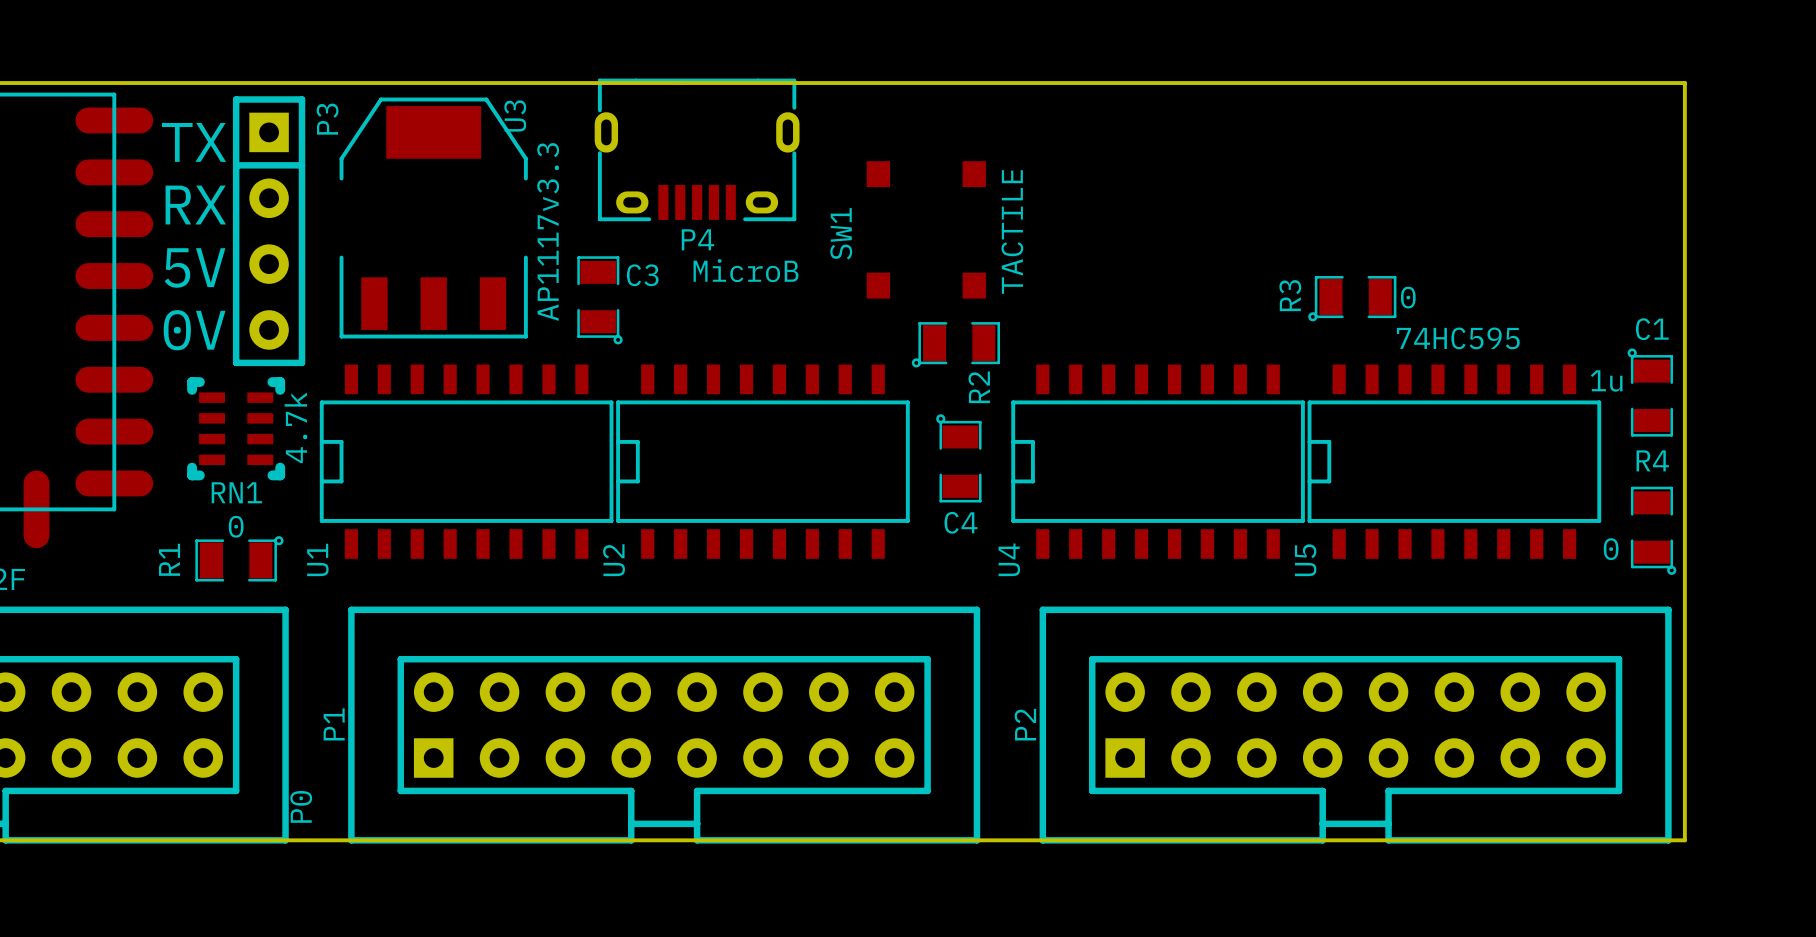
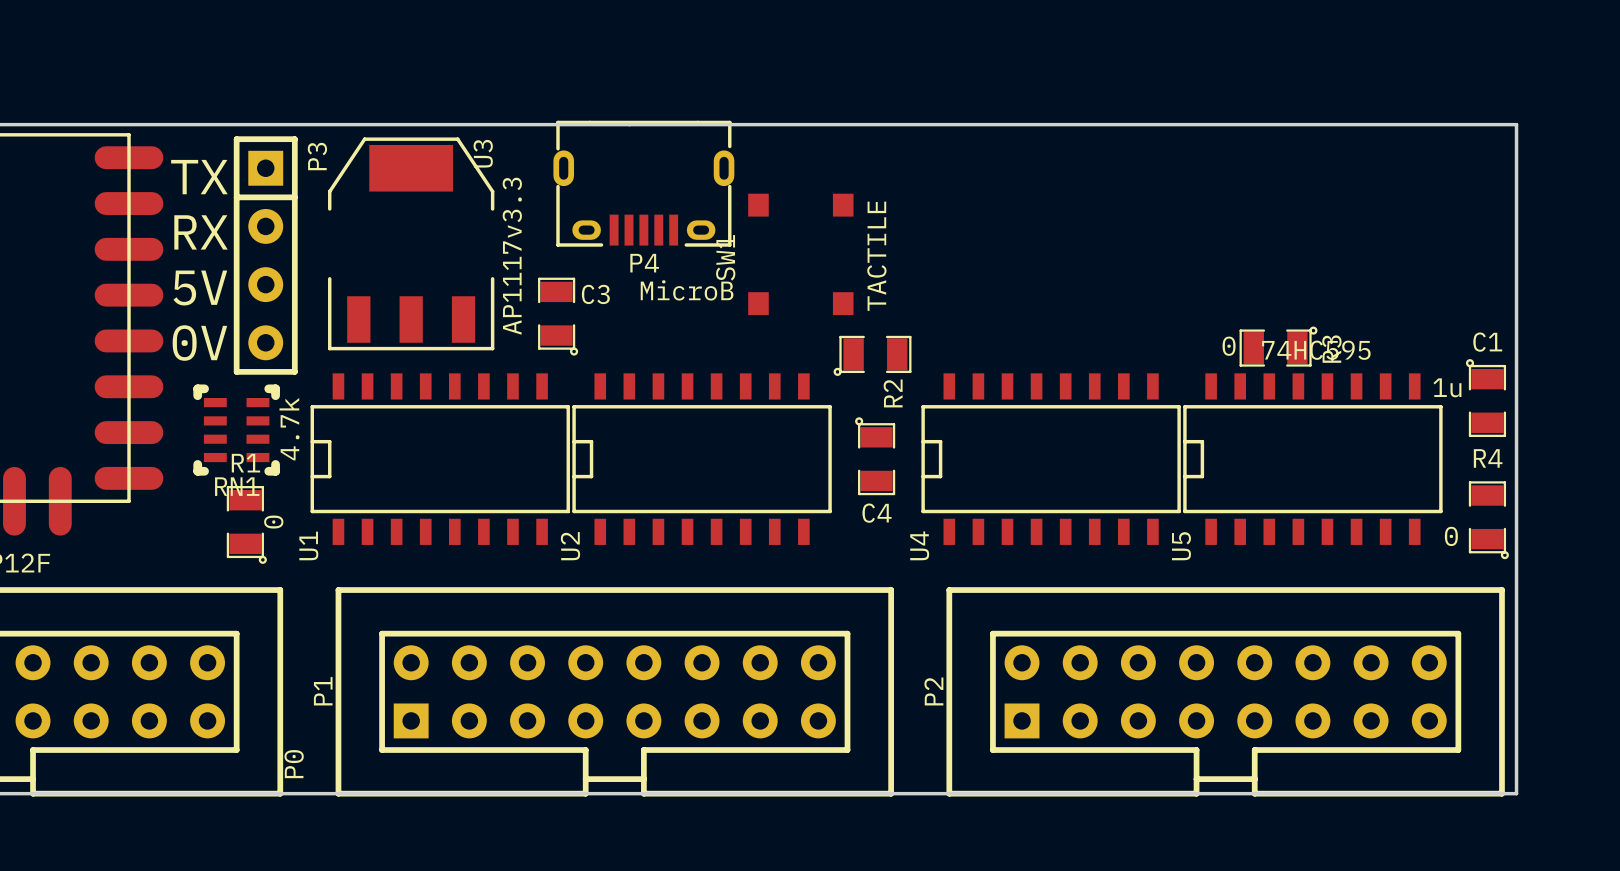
SW1 position: (926, 229) -> (800, 254)
R3 rotation: 0° (1352, 298) -> 180° (1278, 346)
R3 position: (1352, 298) -> (1278, 346)
R1 rotation: 0° (239, 558) -> 90° clockwise (246, 524)

